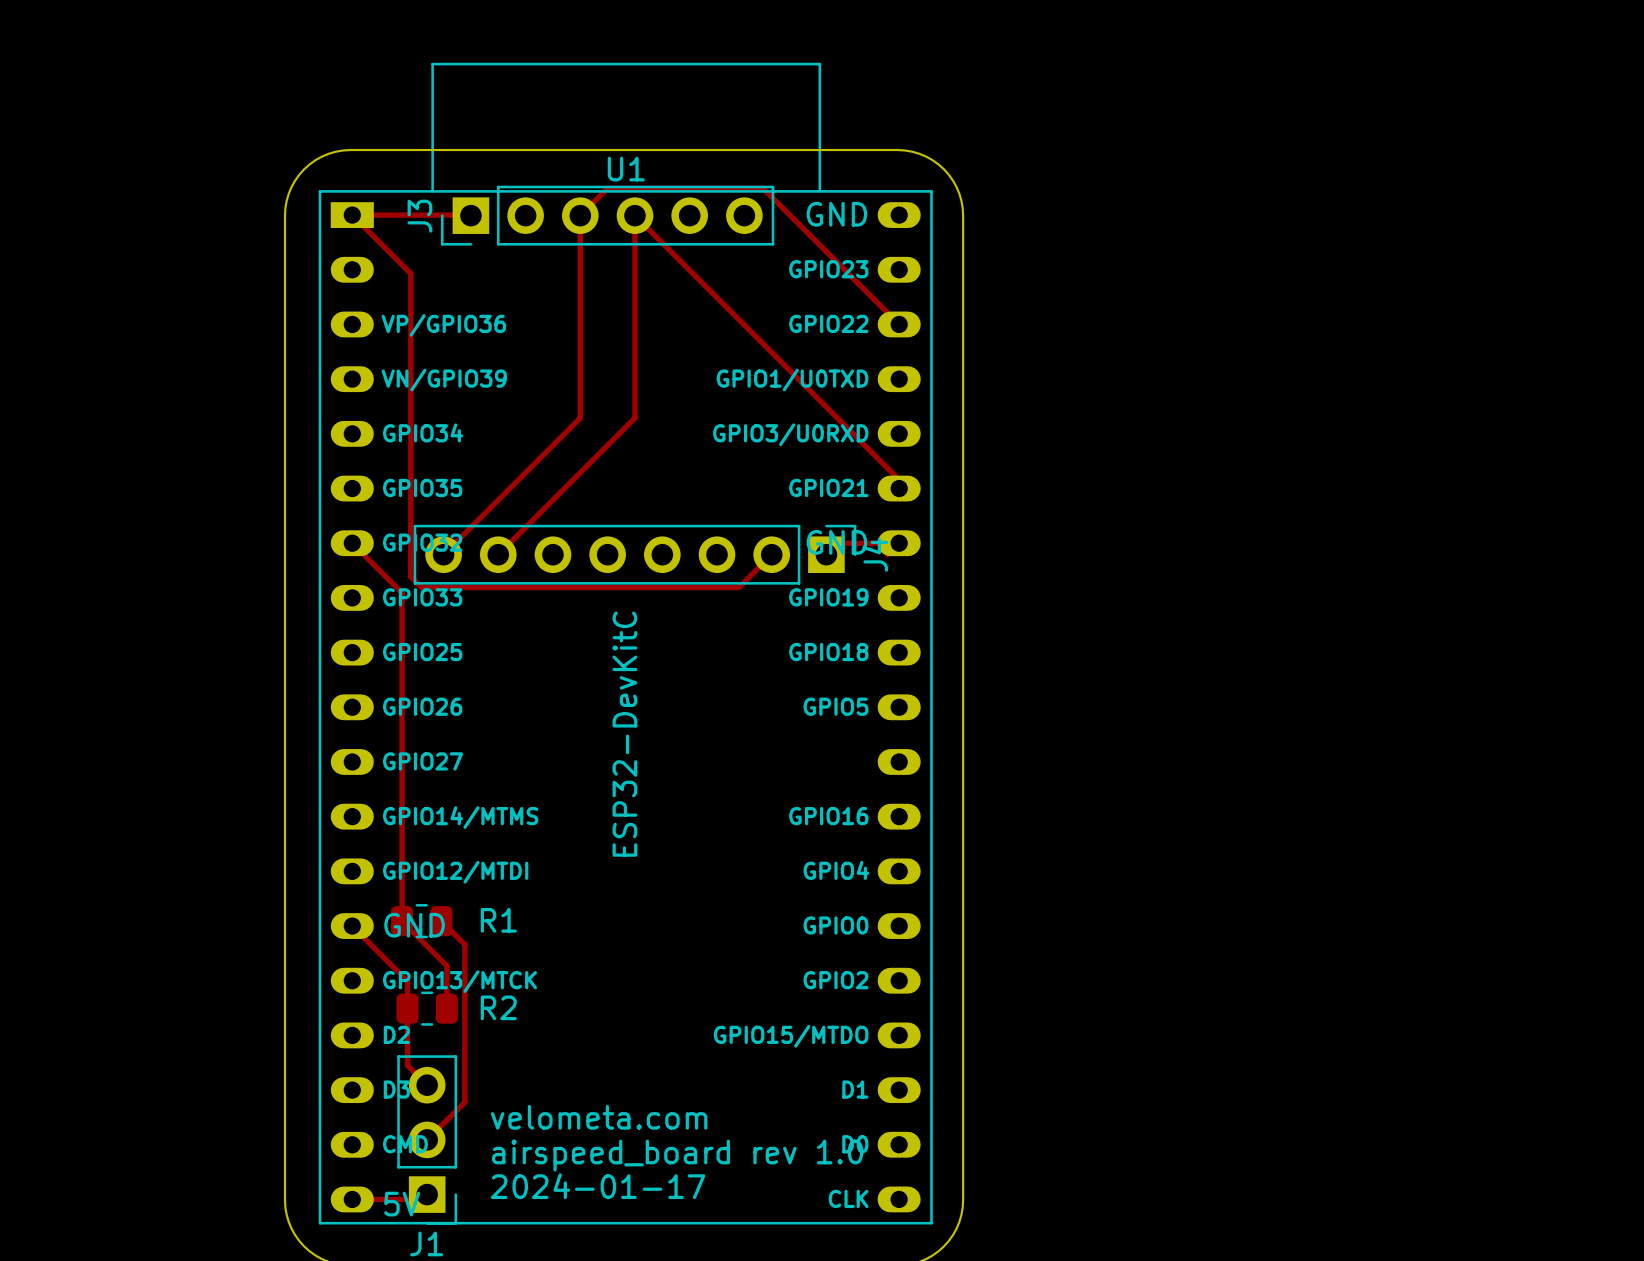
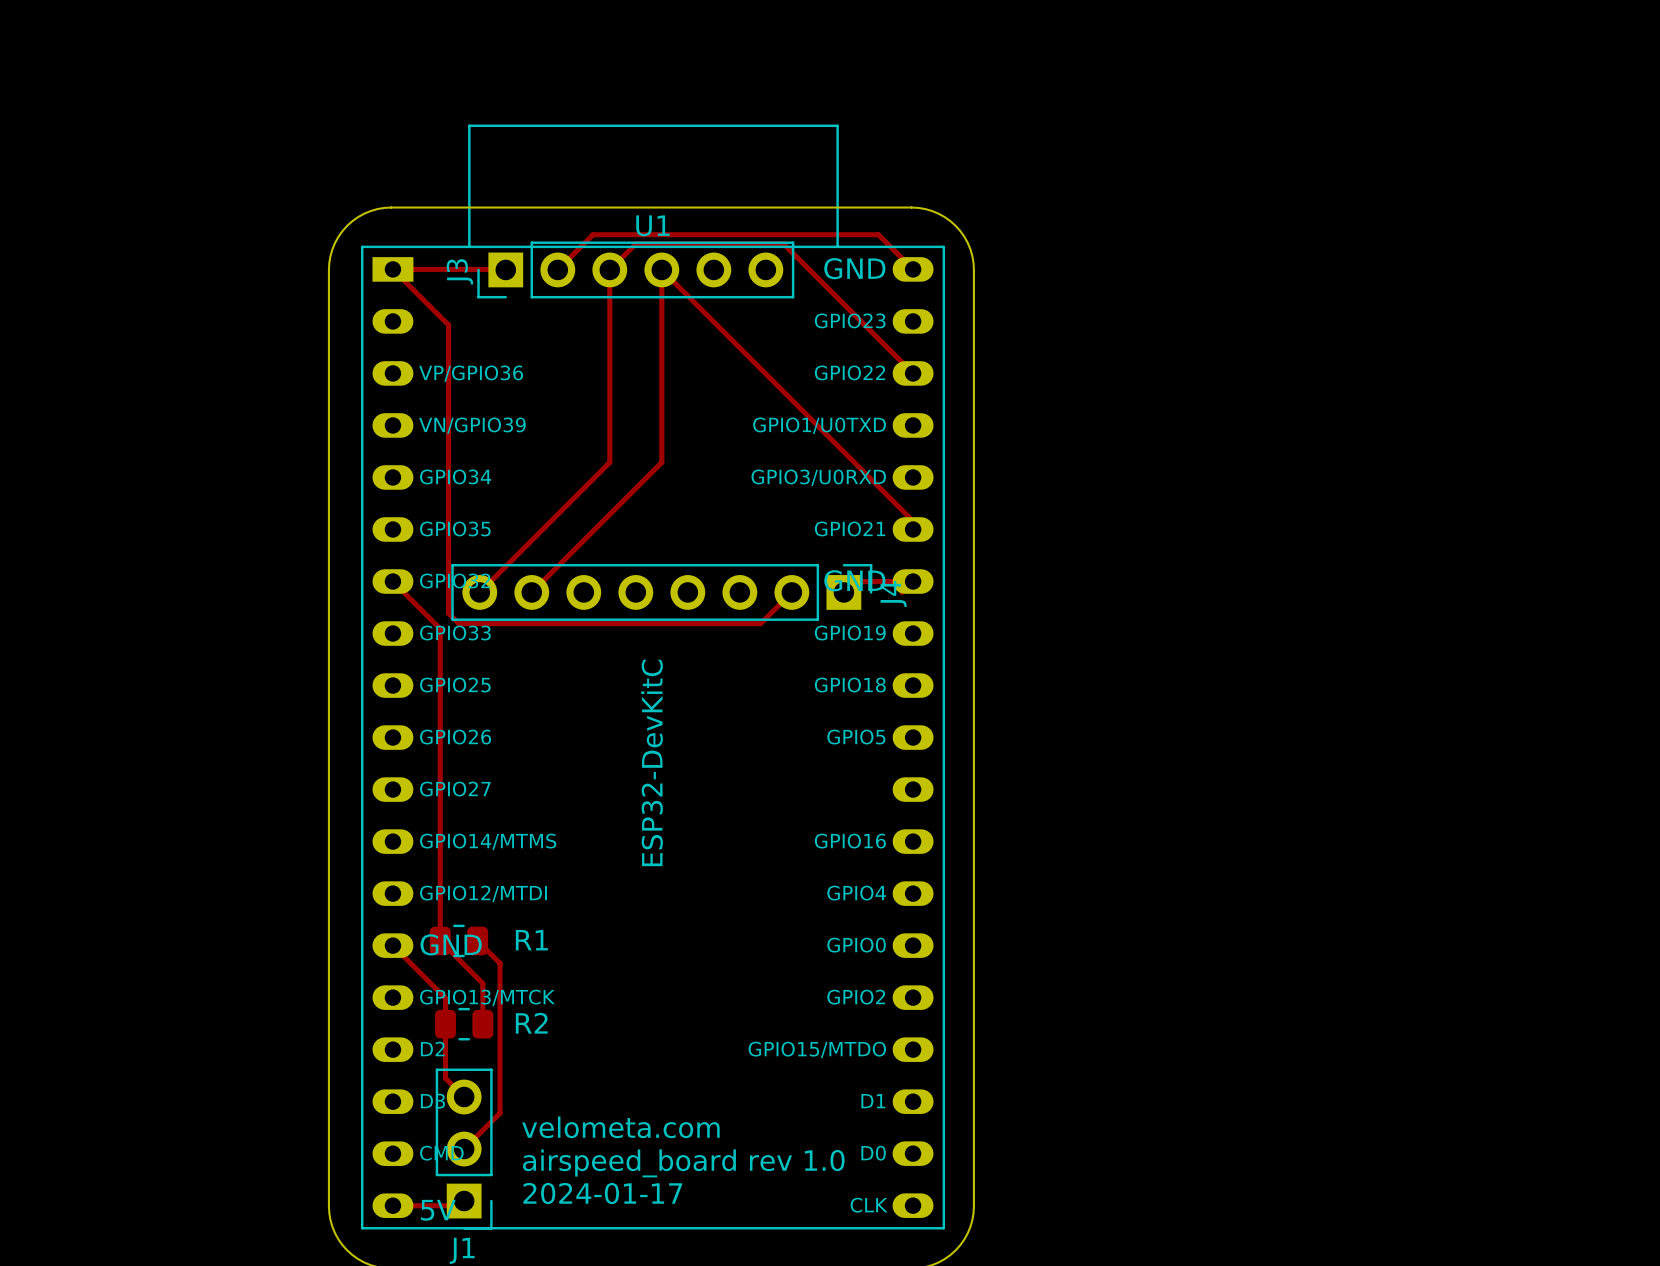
top track: none -> (913, 269) (878, 234) (593, 234) (557, 269)

